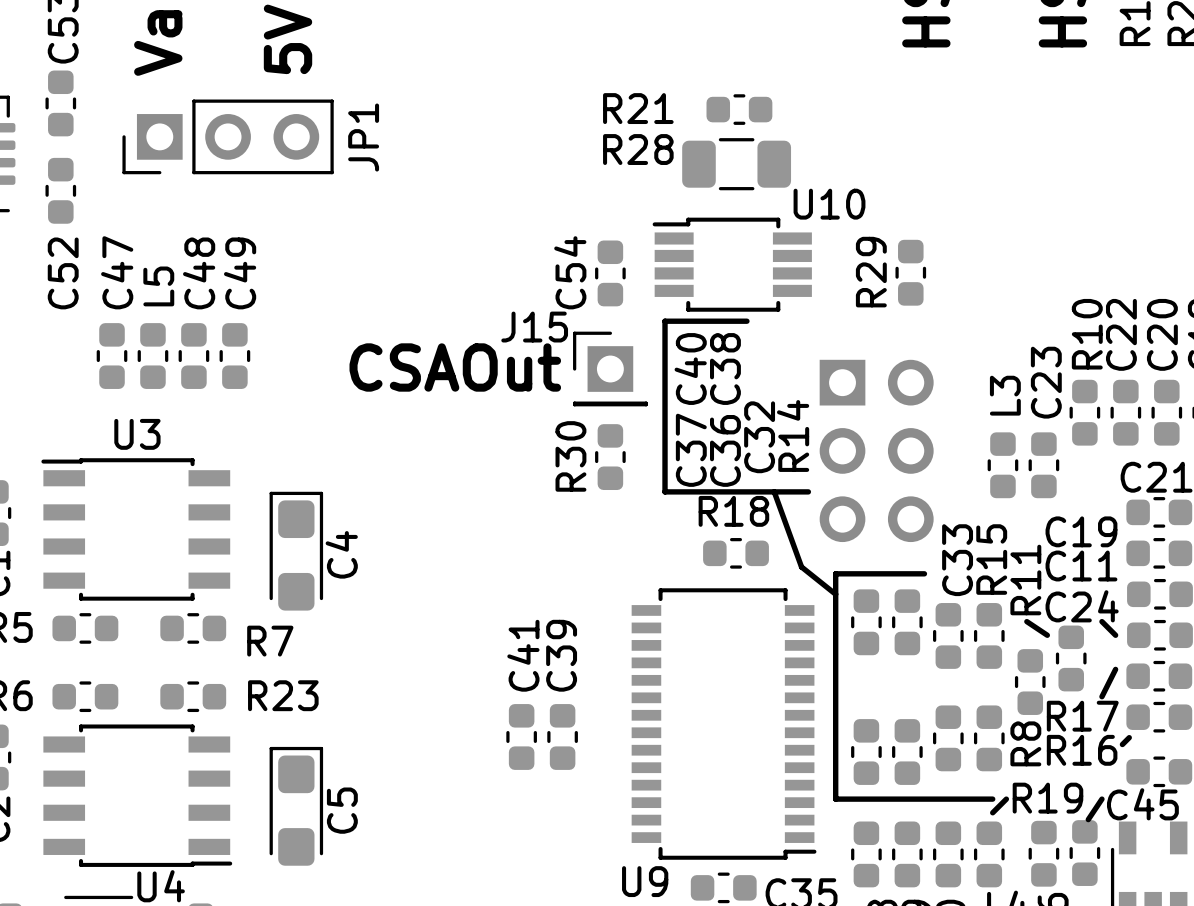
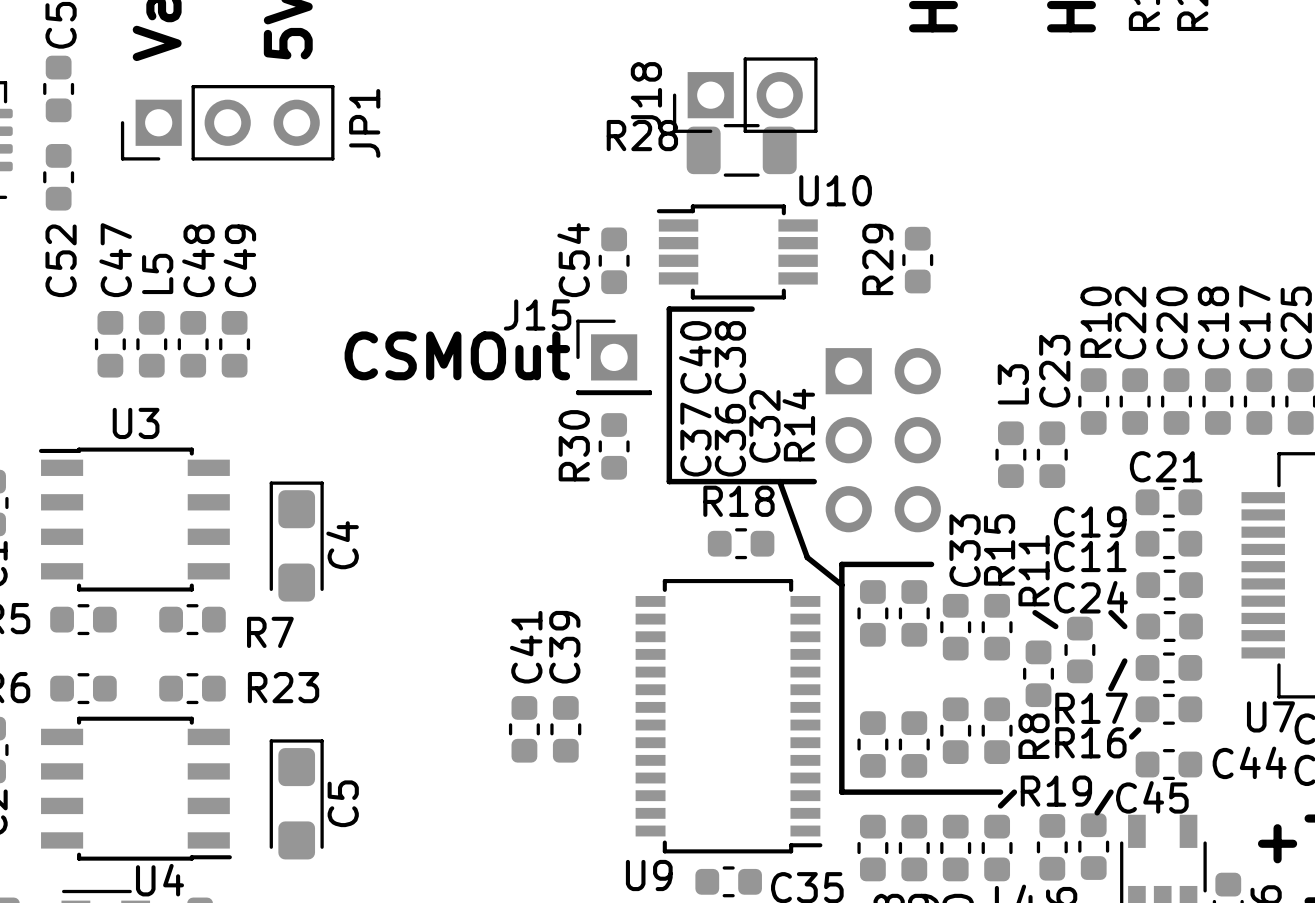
R21: (739, 109) -> none
J18: none -> (745, 95)
text: CSAOut (455, 367) -> CSMOut (457, 355)

